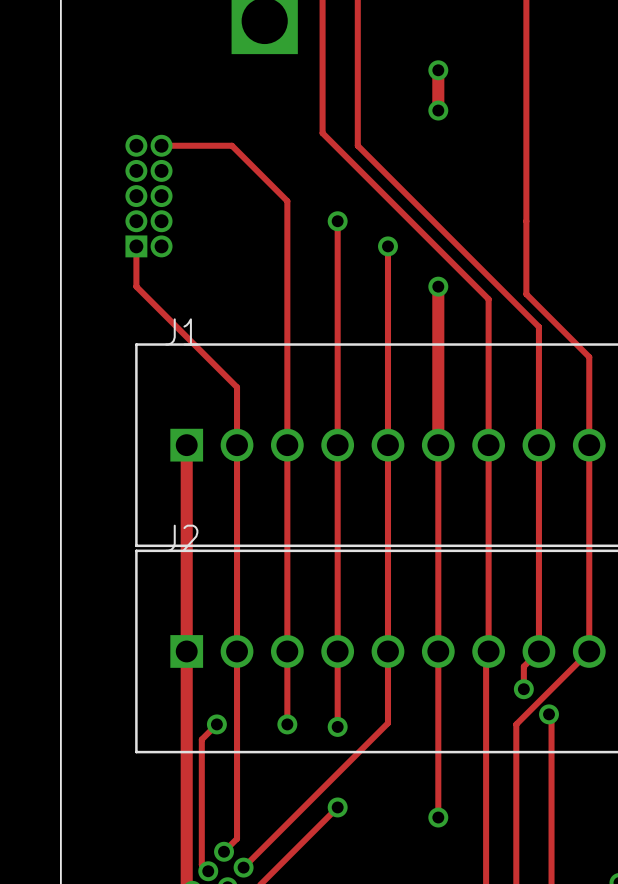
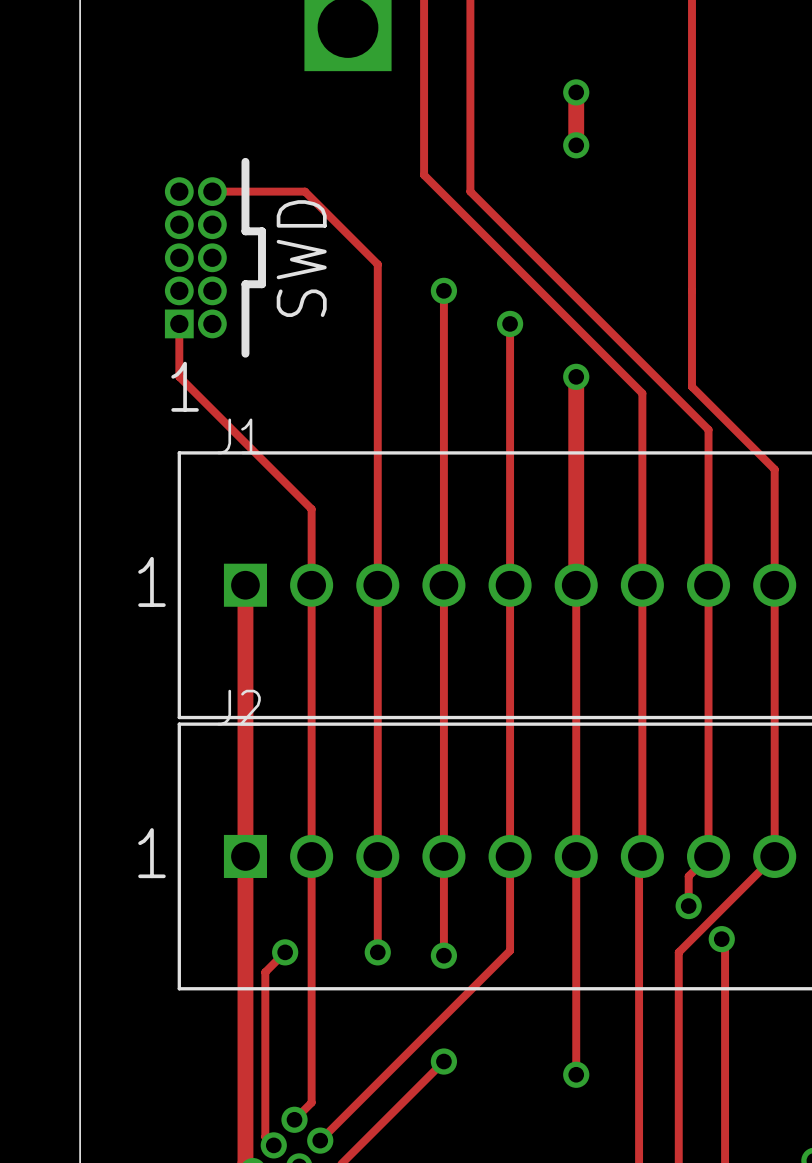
line: none -> (245, 161) (245, 231) (262, 231) (262, 284) (245, 284) (245, 353)
text: none -> SWD (301, 258)
text: none -> 1 (185, 386)
text: none -> 1 (151, 581)
text: none -> 1 (151, 853)

